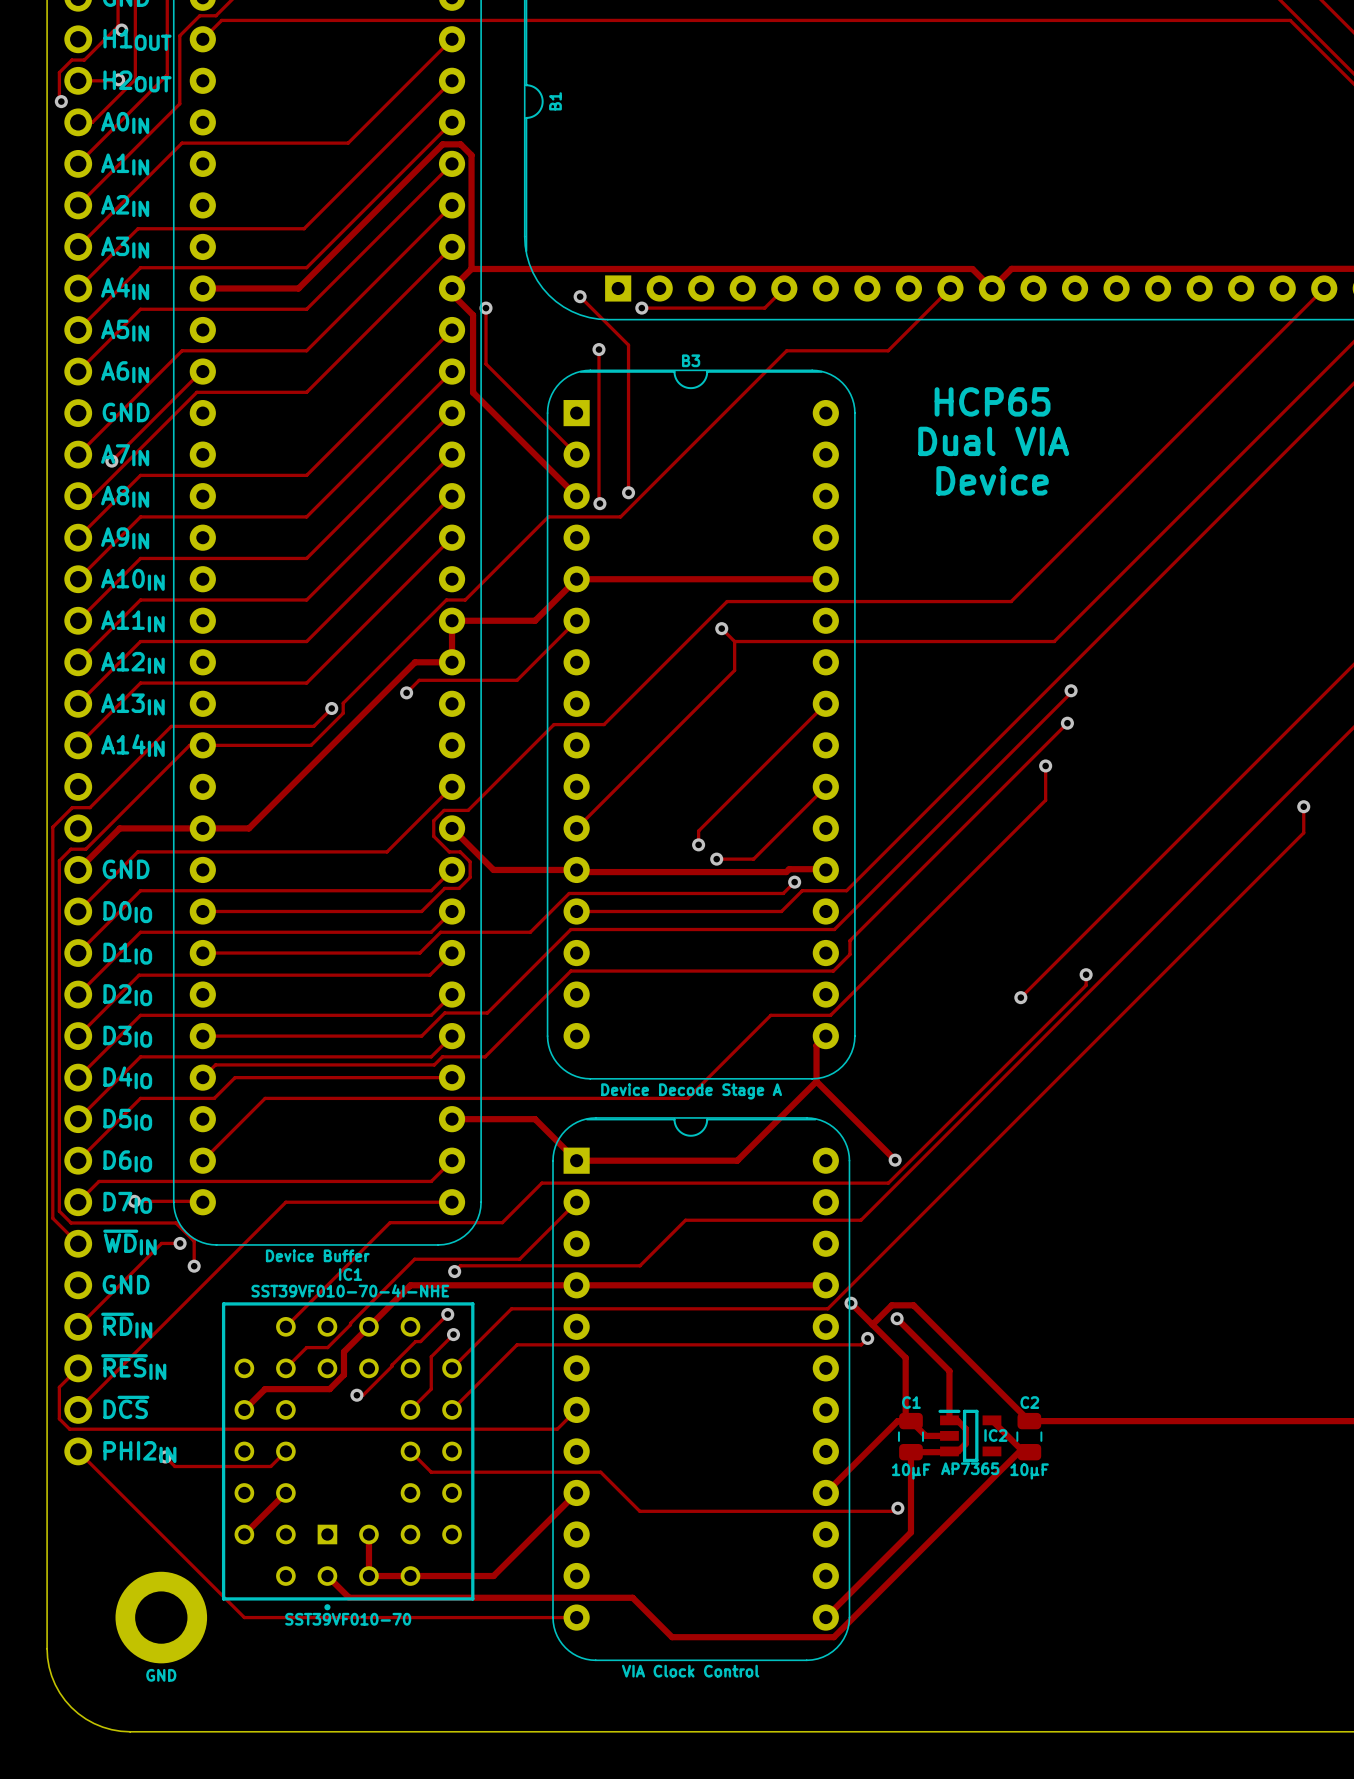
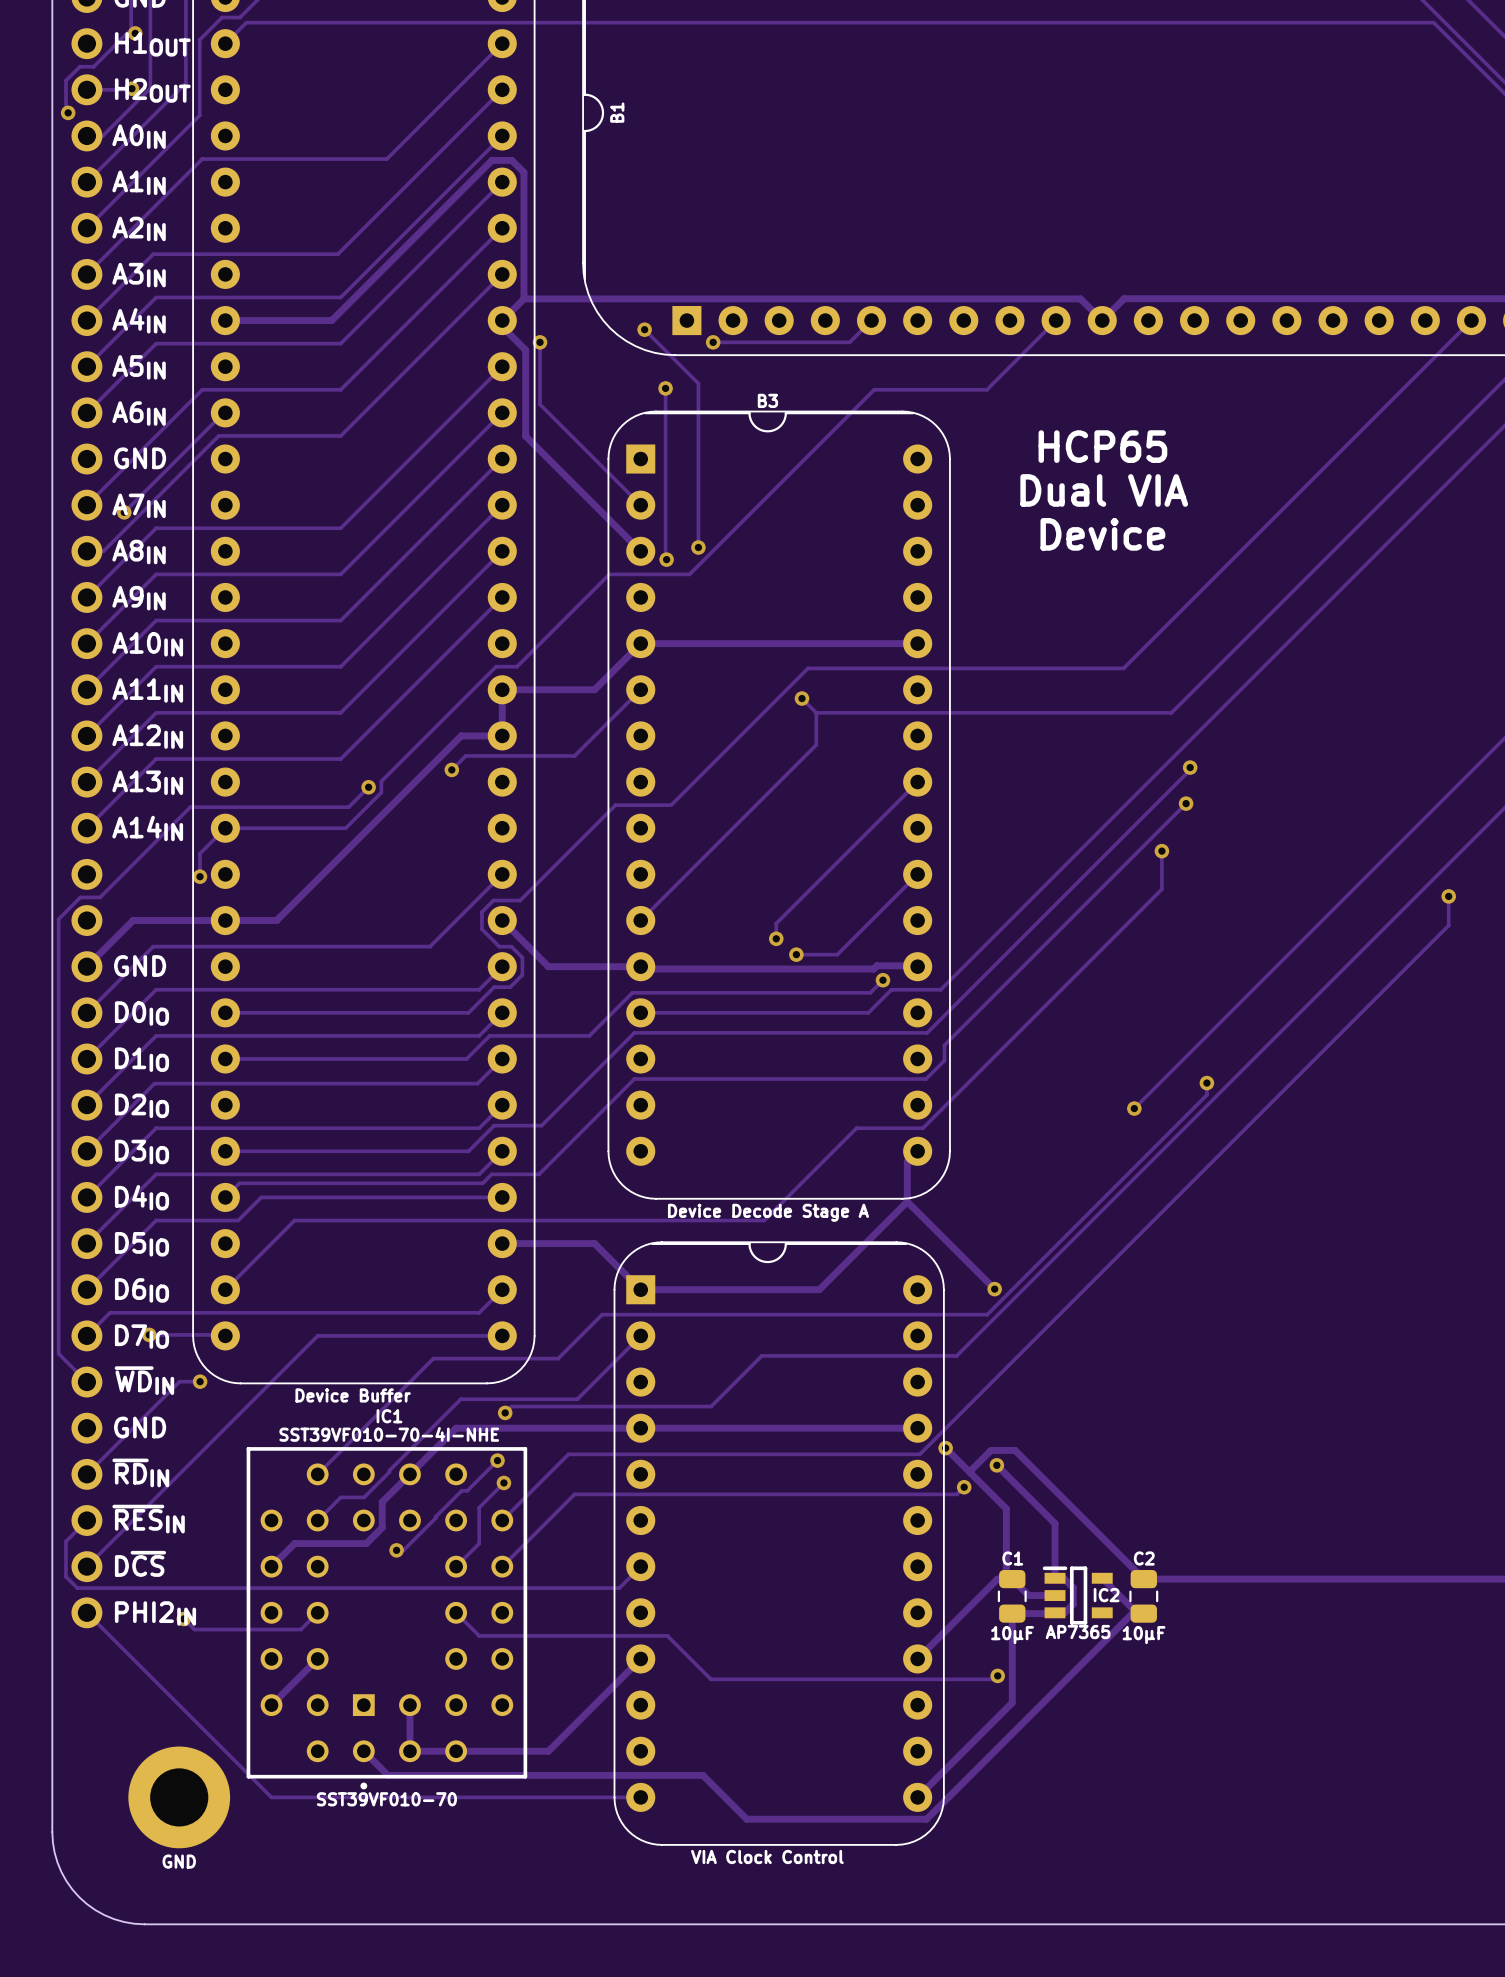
track: (202, 745) (189, 745) (85, 849) (70, 849) (59, 860) (59, 1211) (71, 1222) (175, 1222) (194, 1241) (194, 1266) -> (225, 828) (200, 853) (200, 876)
via: none -> (200, 876)
via: (194, 1266) -> none

